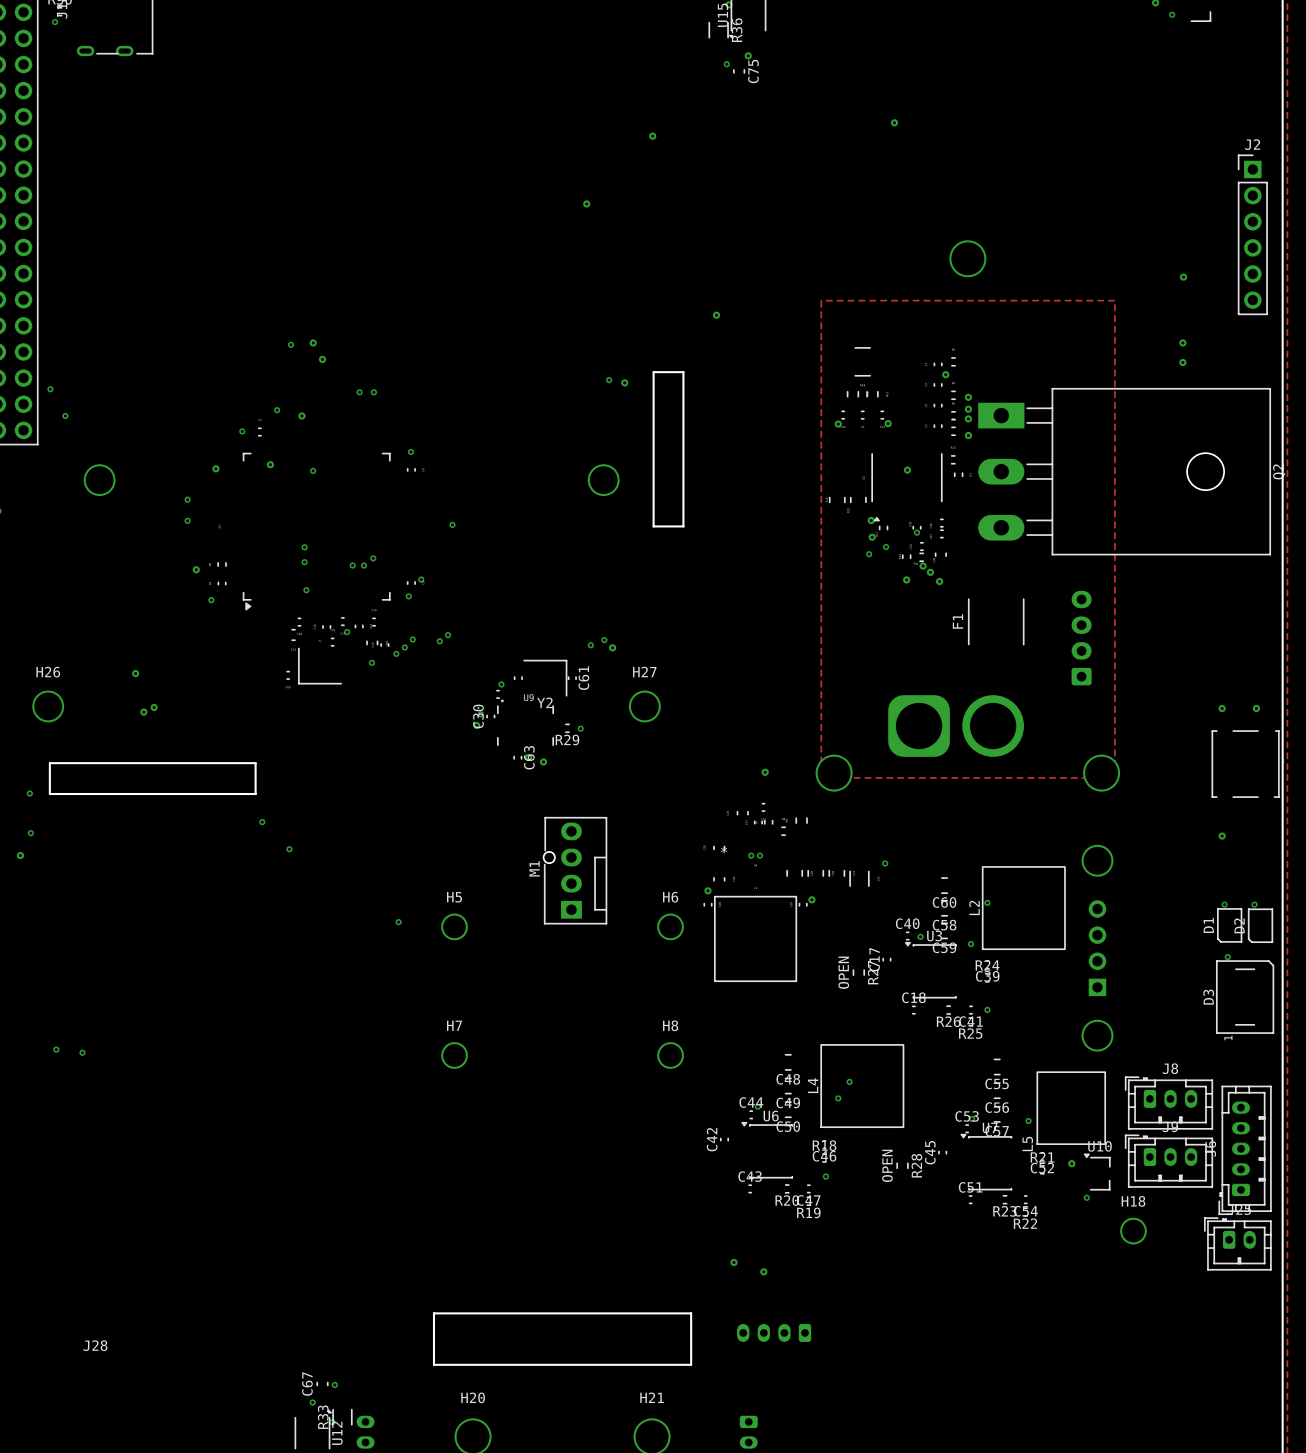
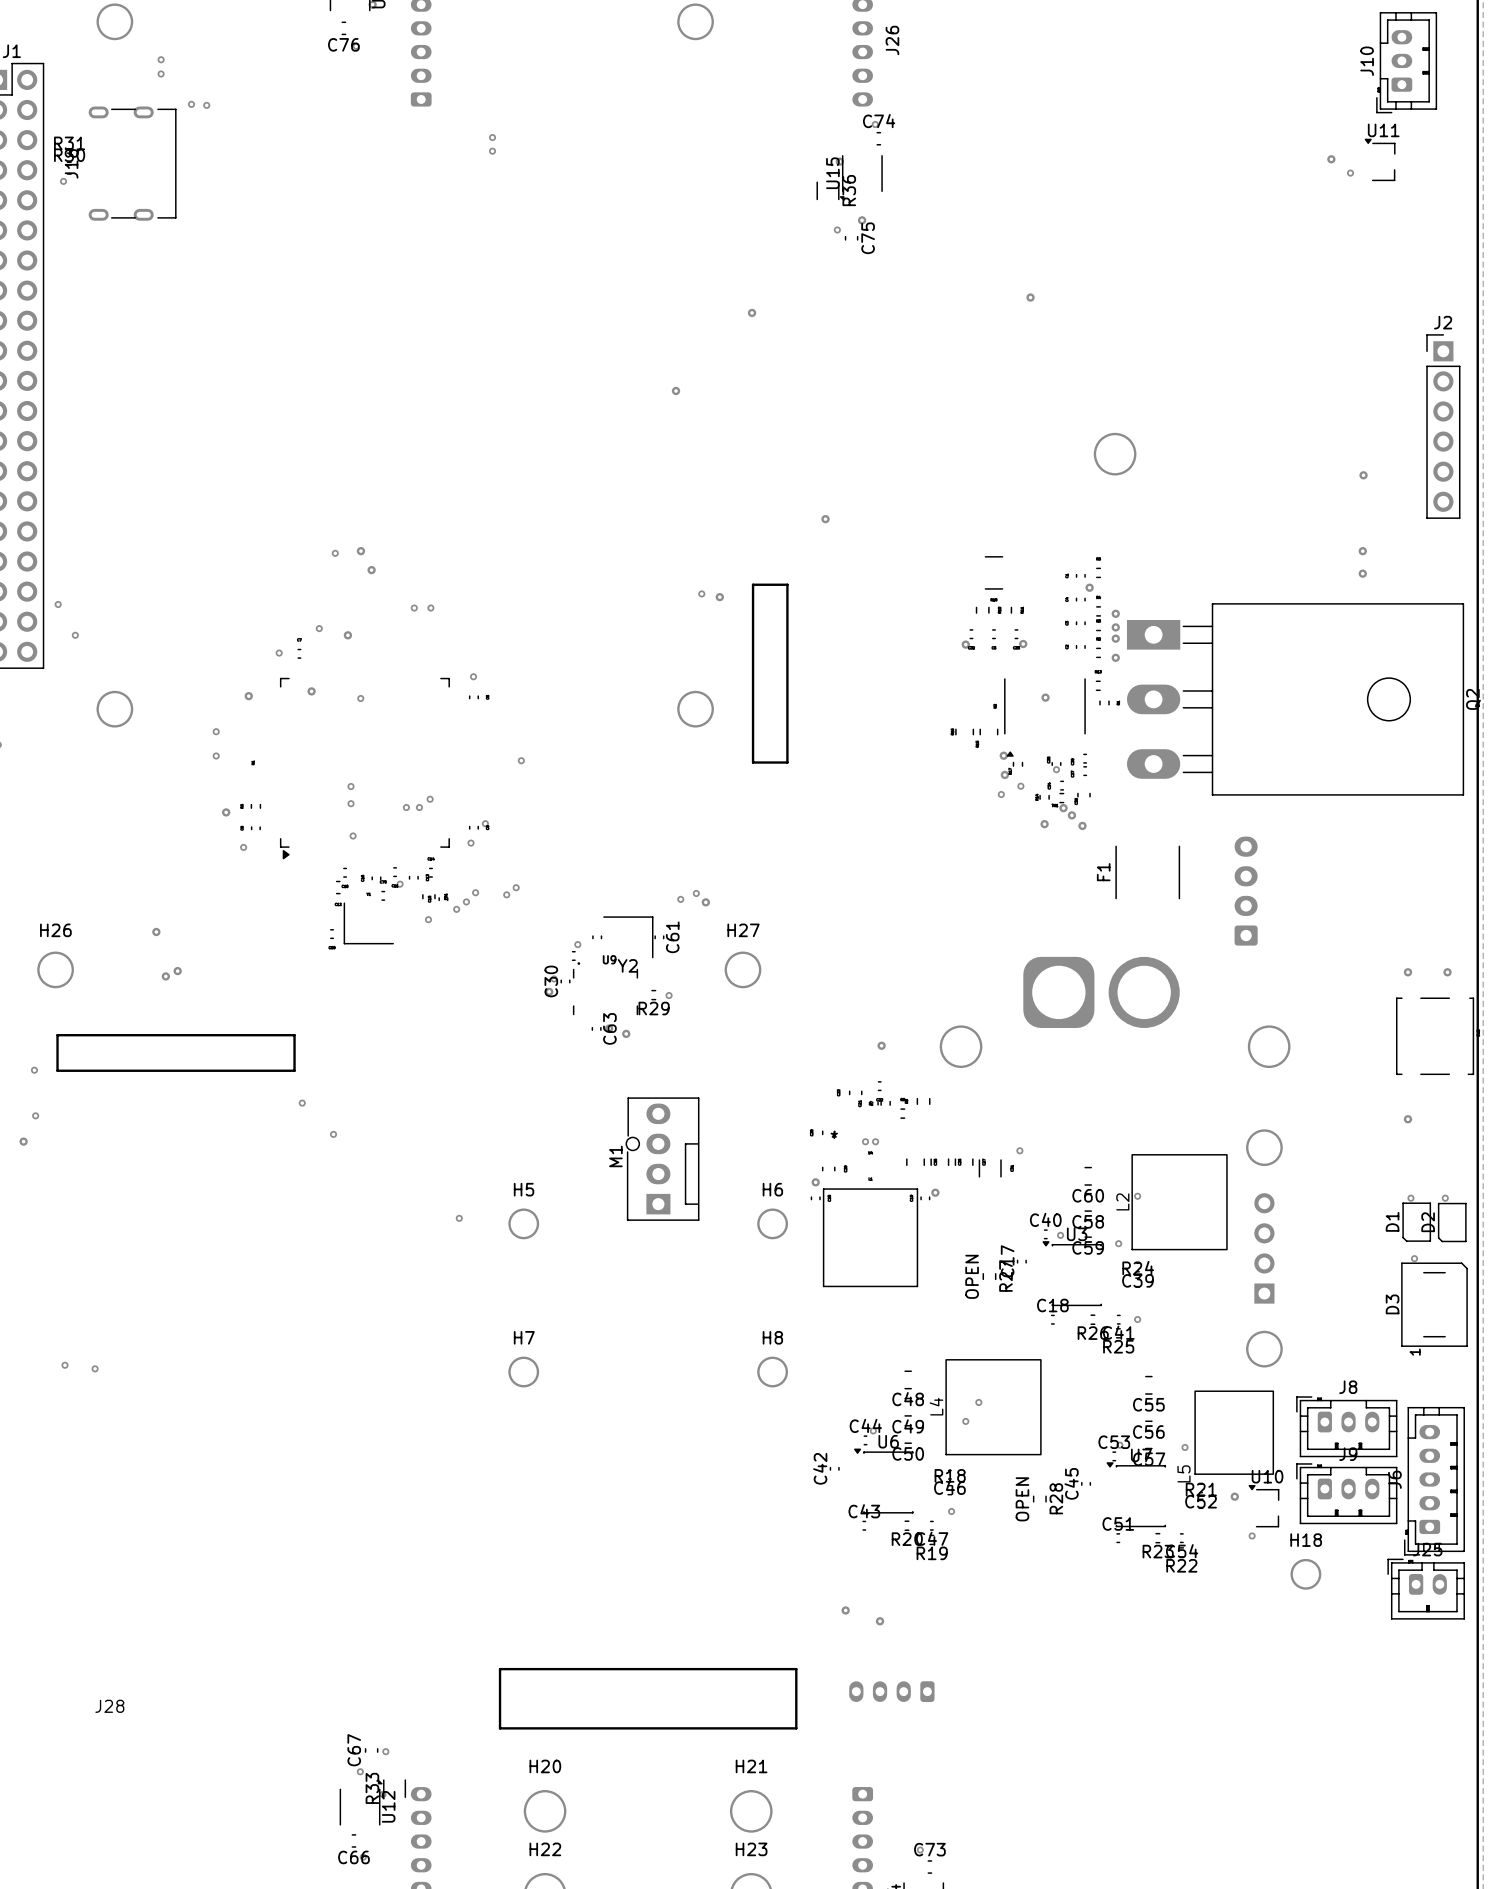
zone outline: (821, 300) (1114, 300) (1114, 777) (821, 777) (821, 300) -> none

